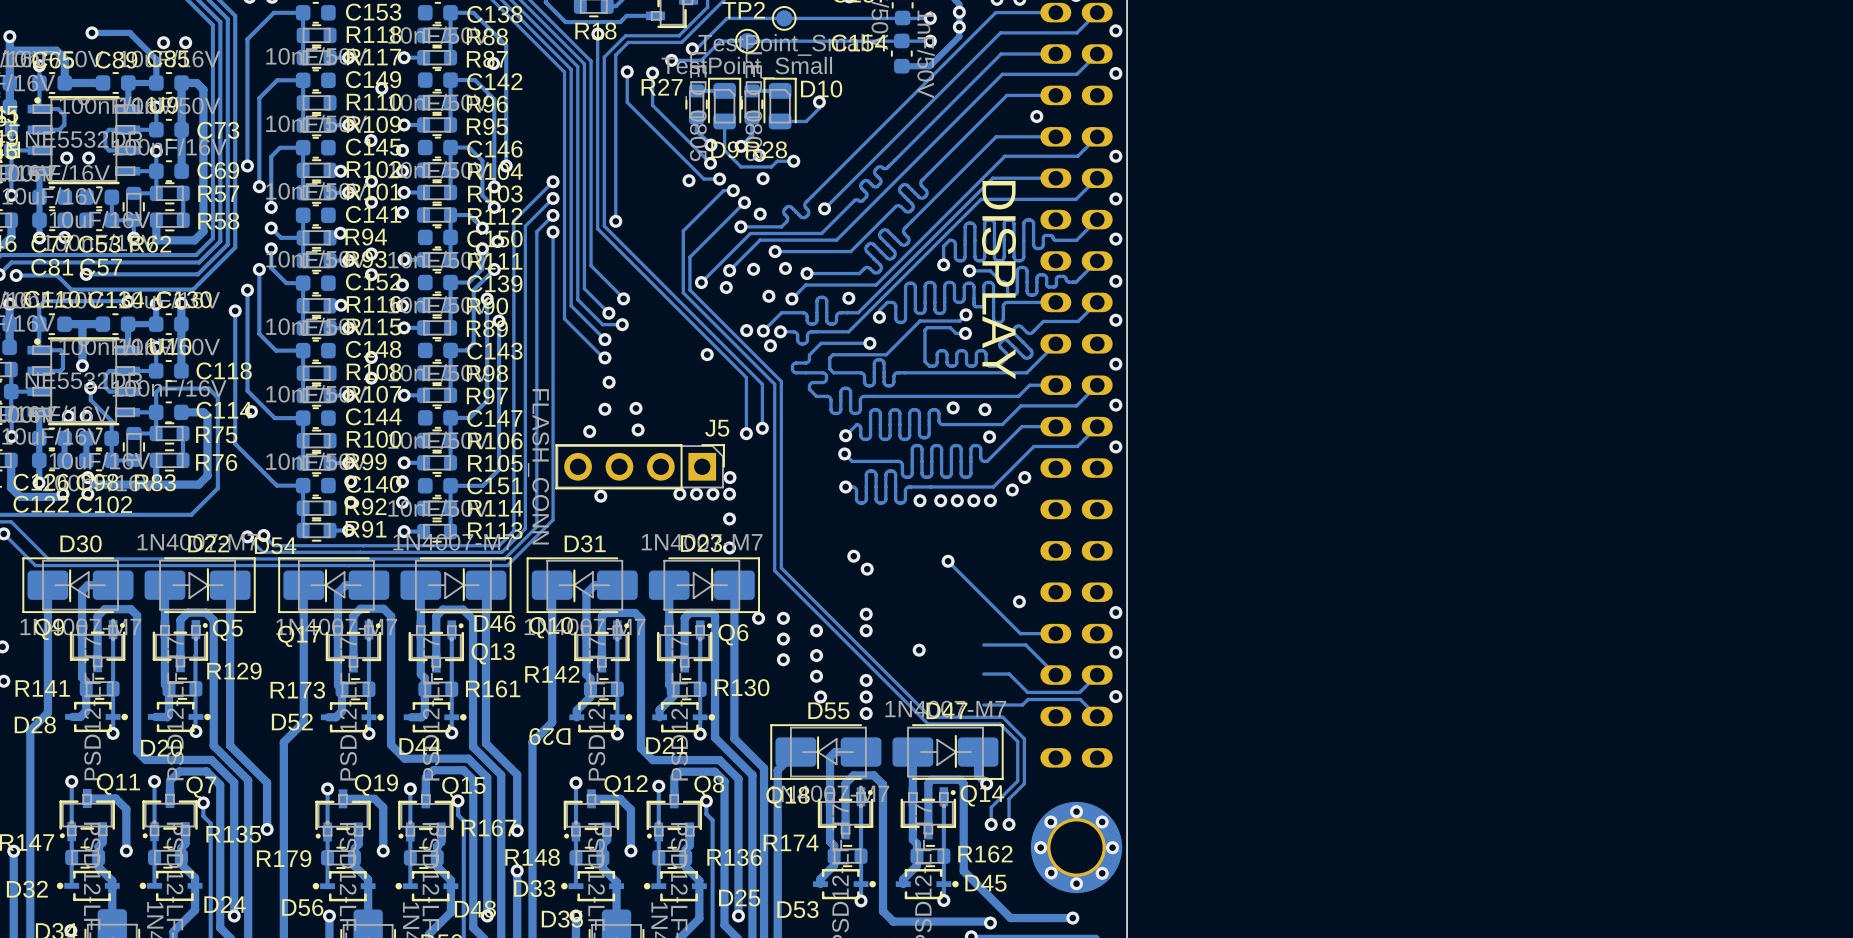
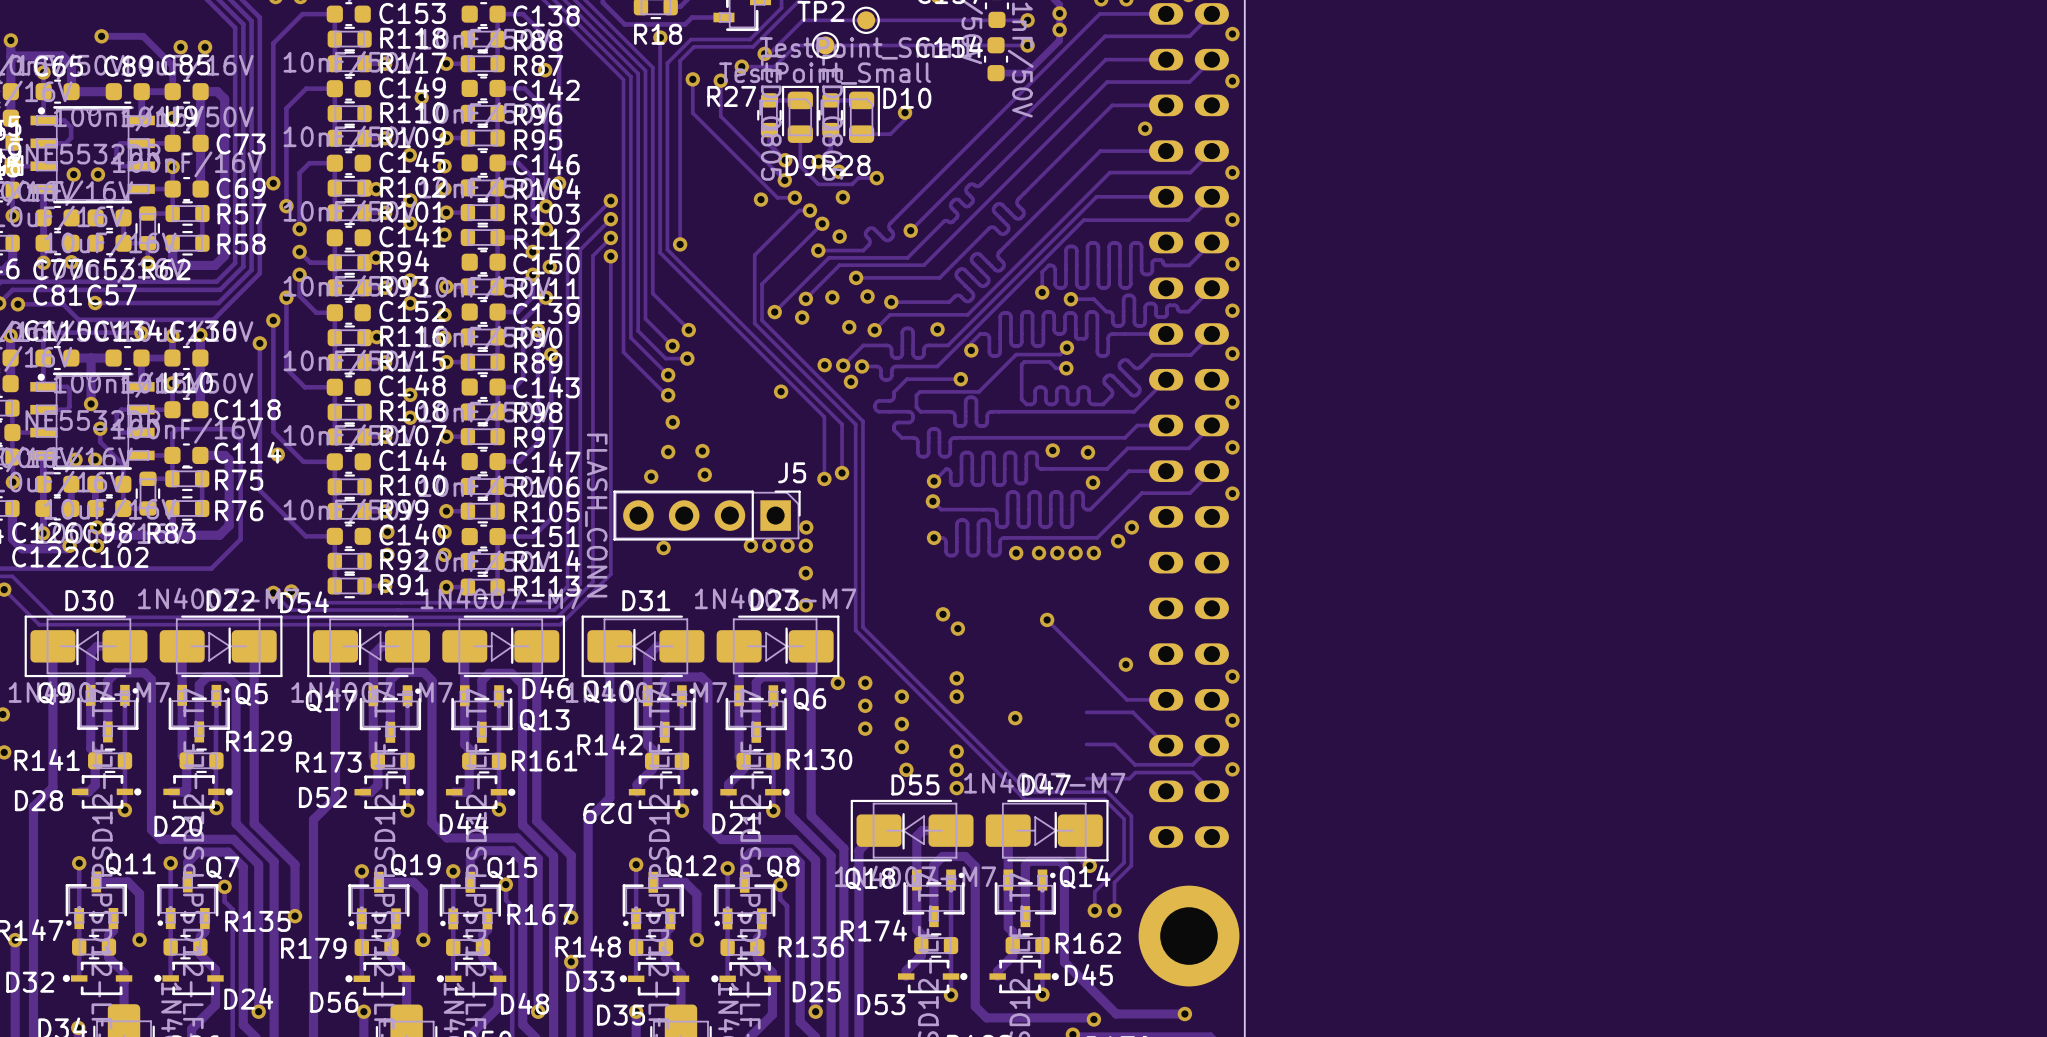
text: DISPLAY (999, 280) -> none
via: (1076, 811) -> none
via: (1050, 822) -> none
via: (1102, 822) -> none
via: (1040, 847) -> none
via: (1112, 847) -> none
via: (1051, 872) -> none
via: (1102, 873) -> none
via: (1076, 883) -> none

